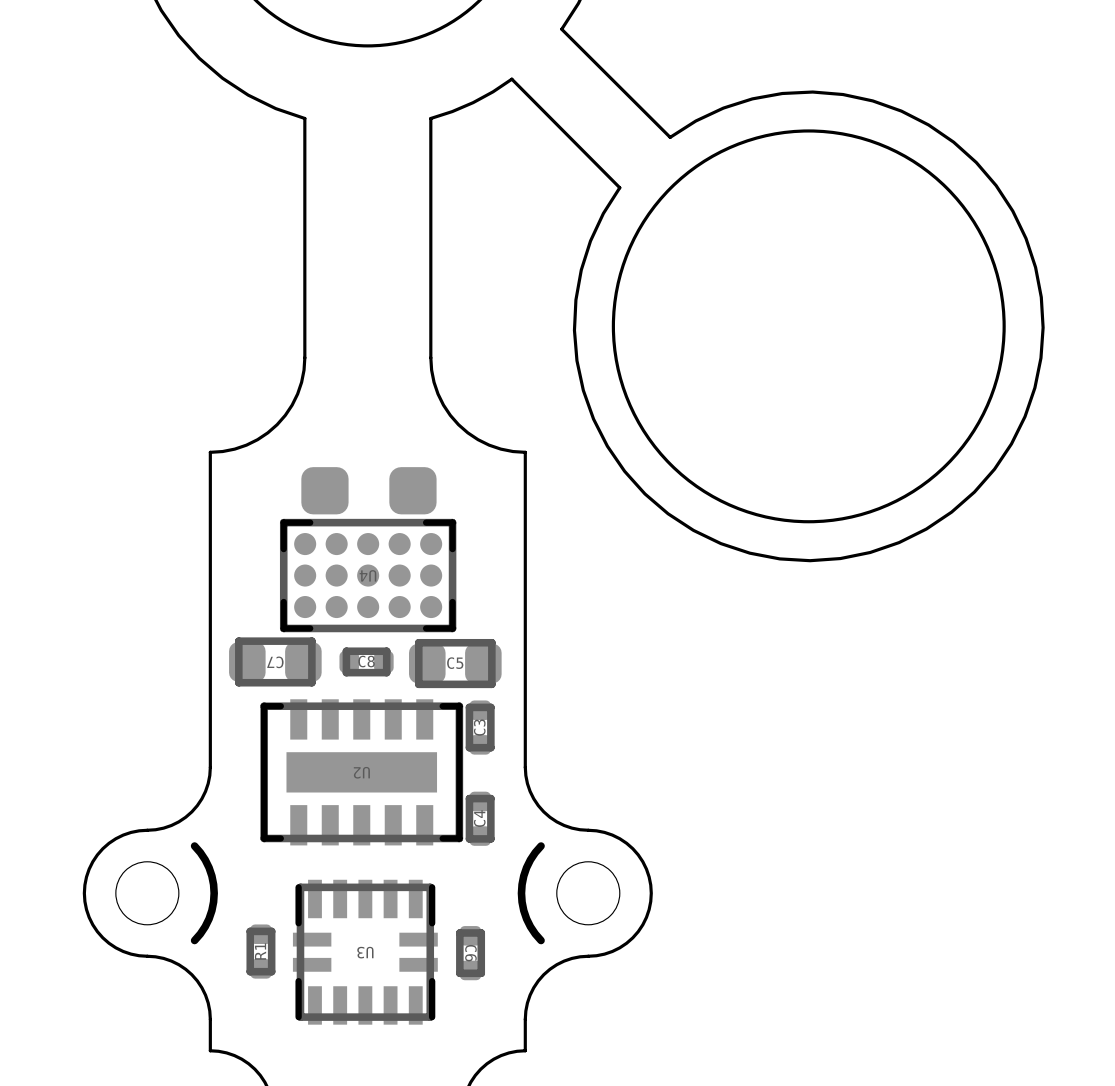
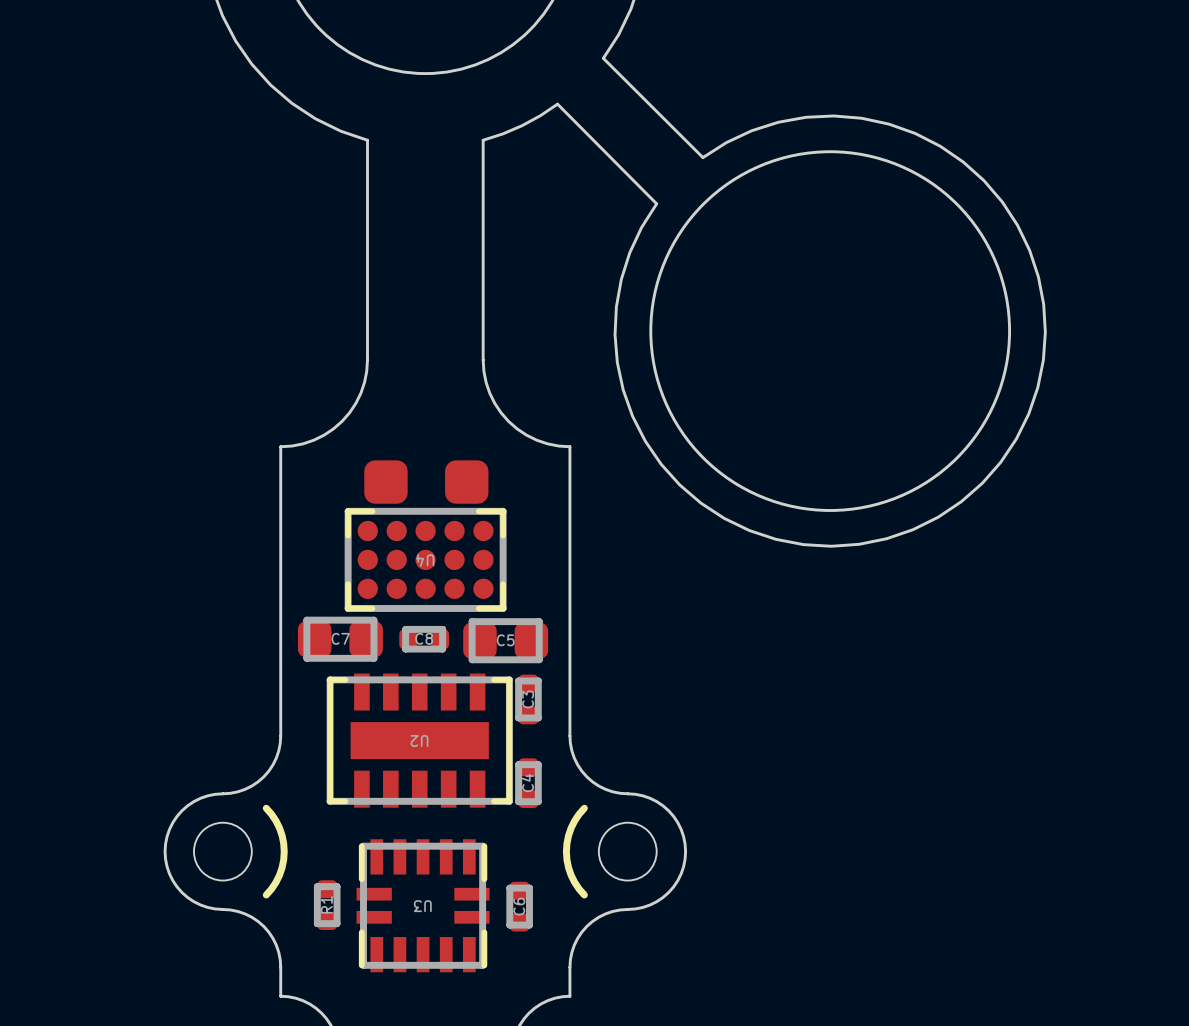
C7 name rotation: 0° (275, 662) -> 180° (340, 638)
C6 name rotation: 0° (470, 953) -> 180° (519, 906)

